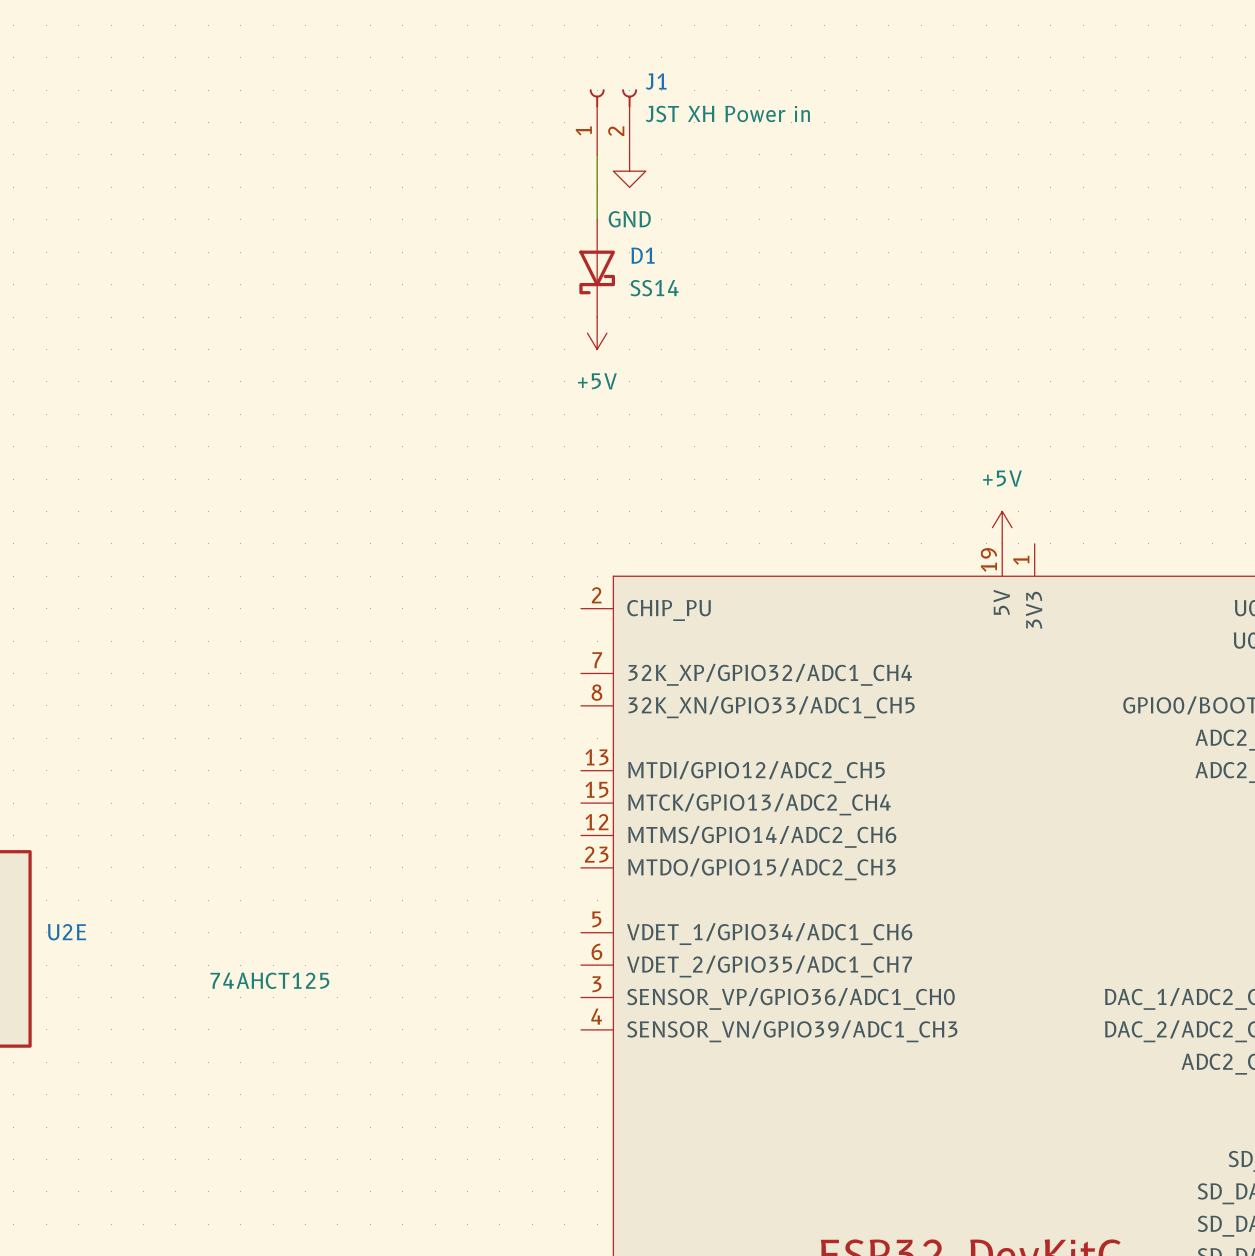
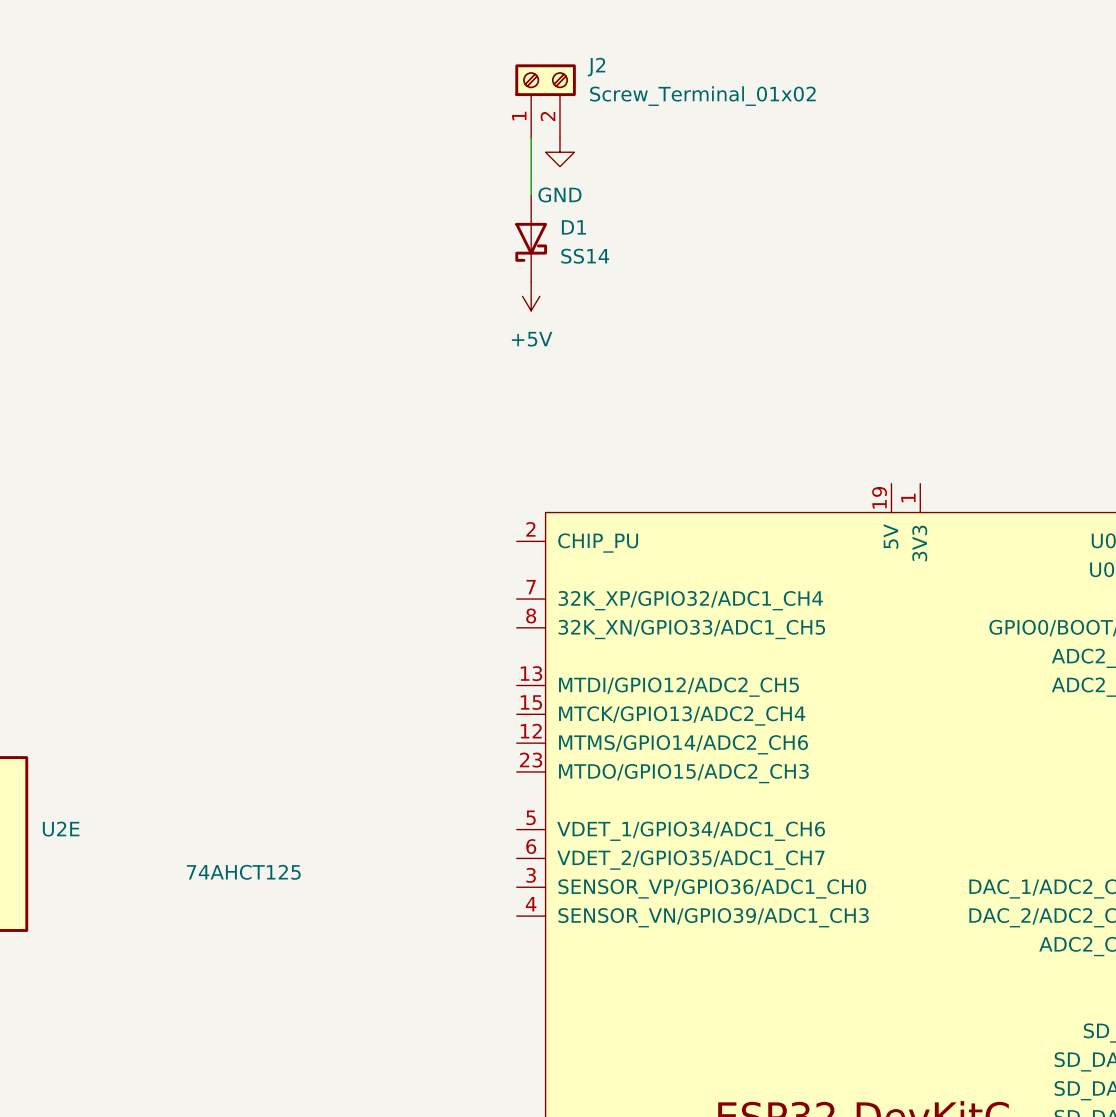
J2: none -> Screw_Terminal_01x02 (545, 101)
J1: JST XH Power in (613, 122) -> none
power symbol: +5V (1002, 527) -> none

